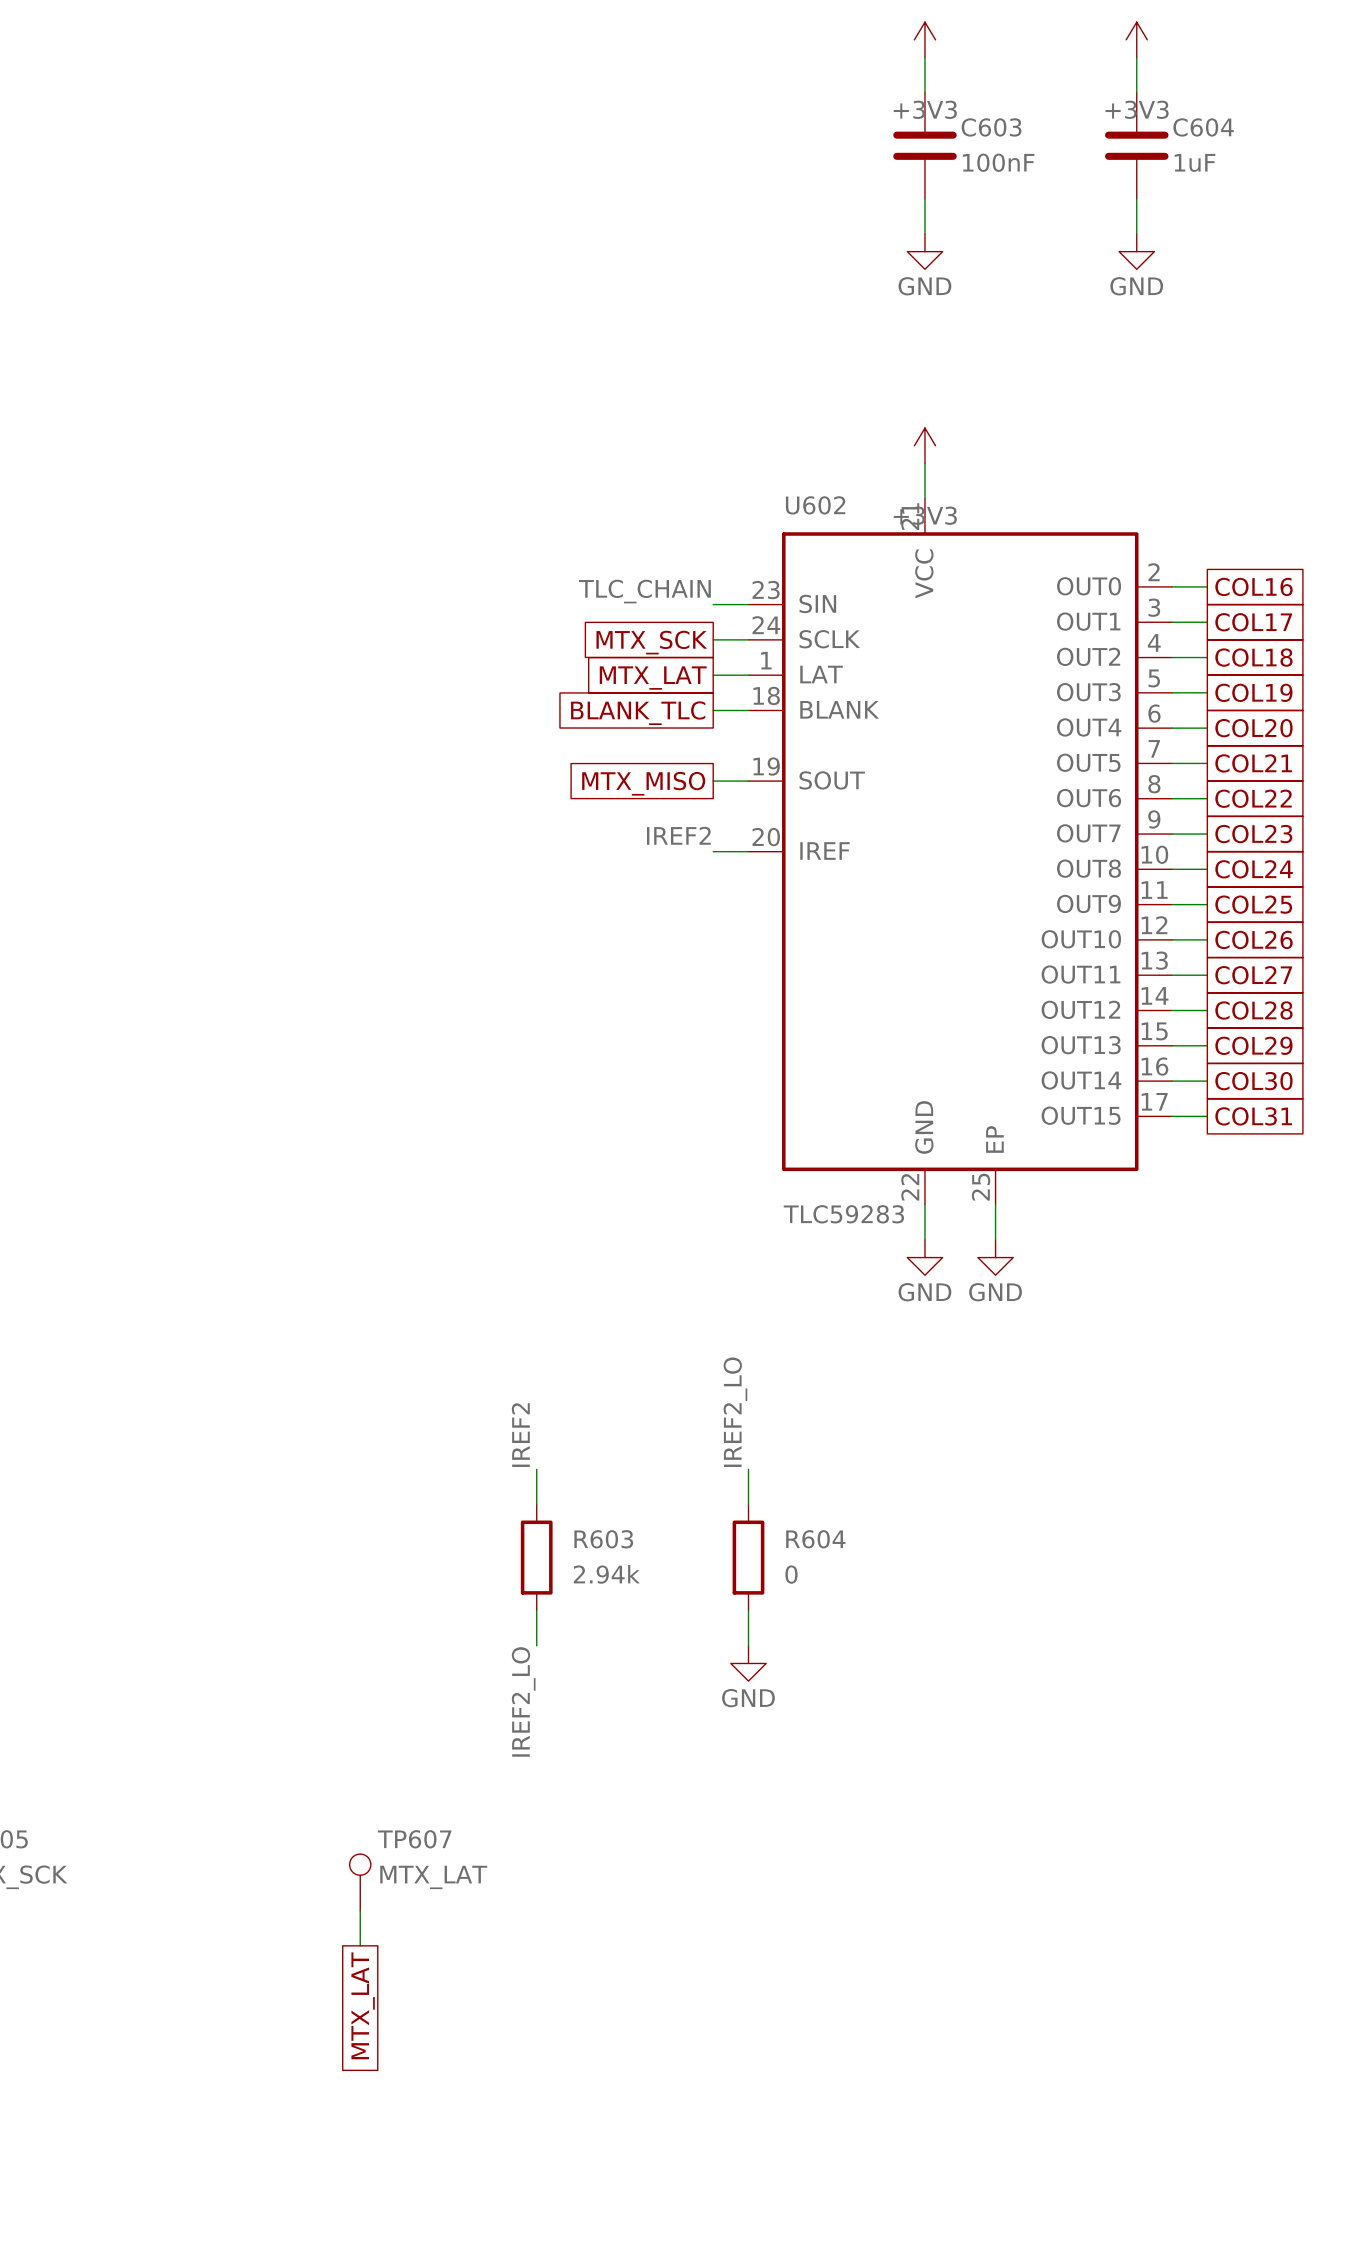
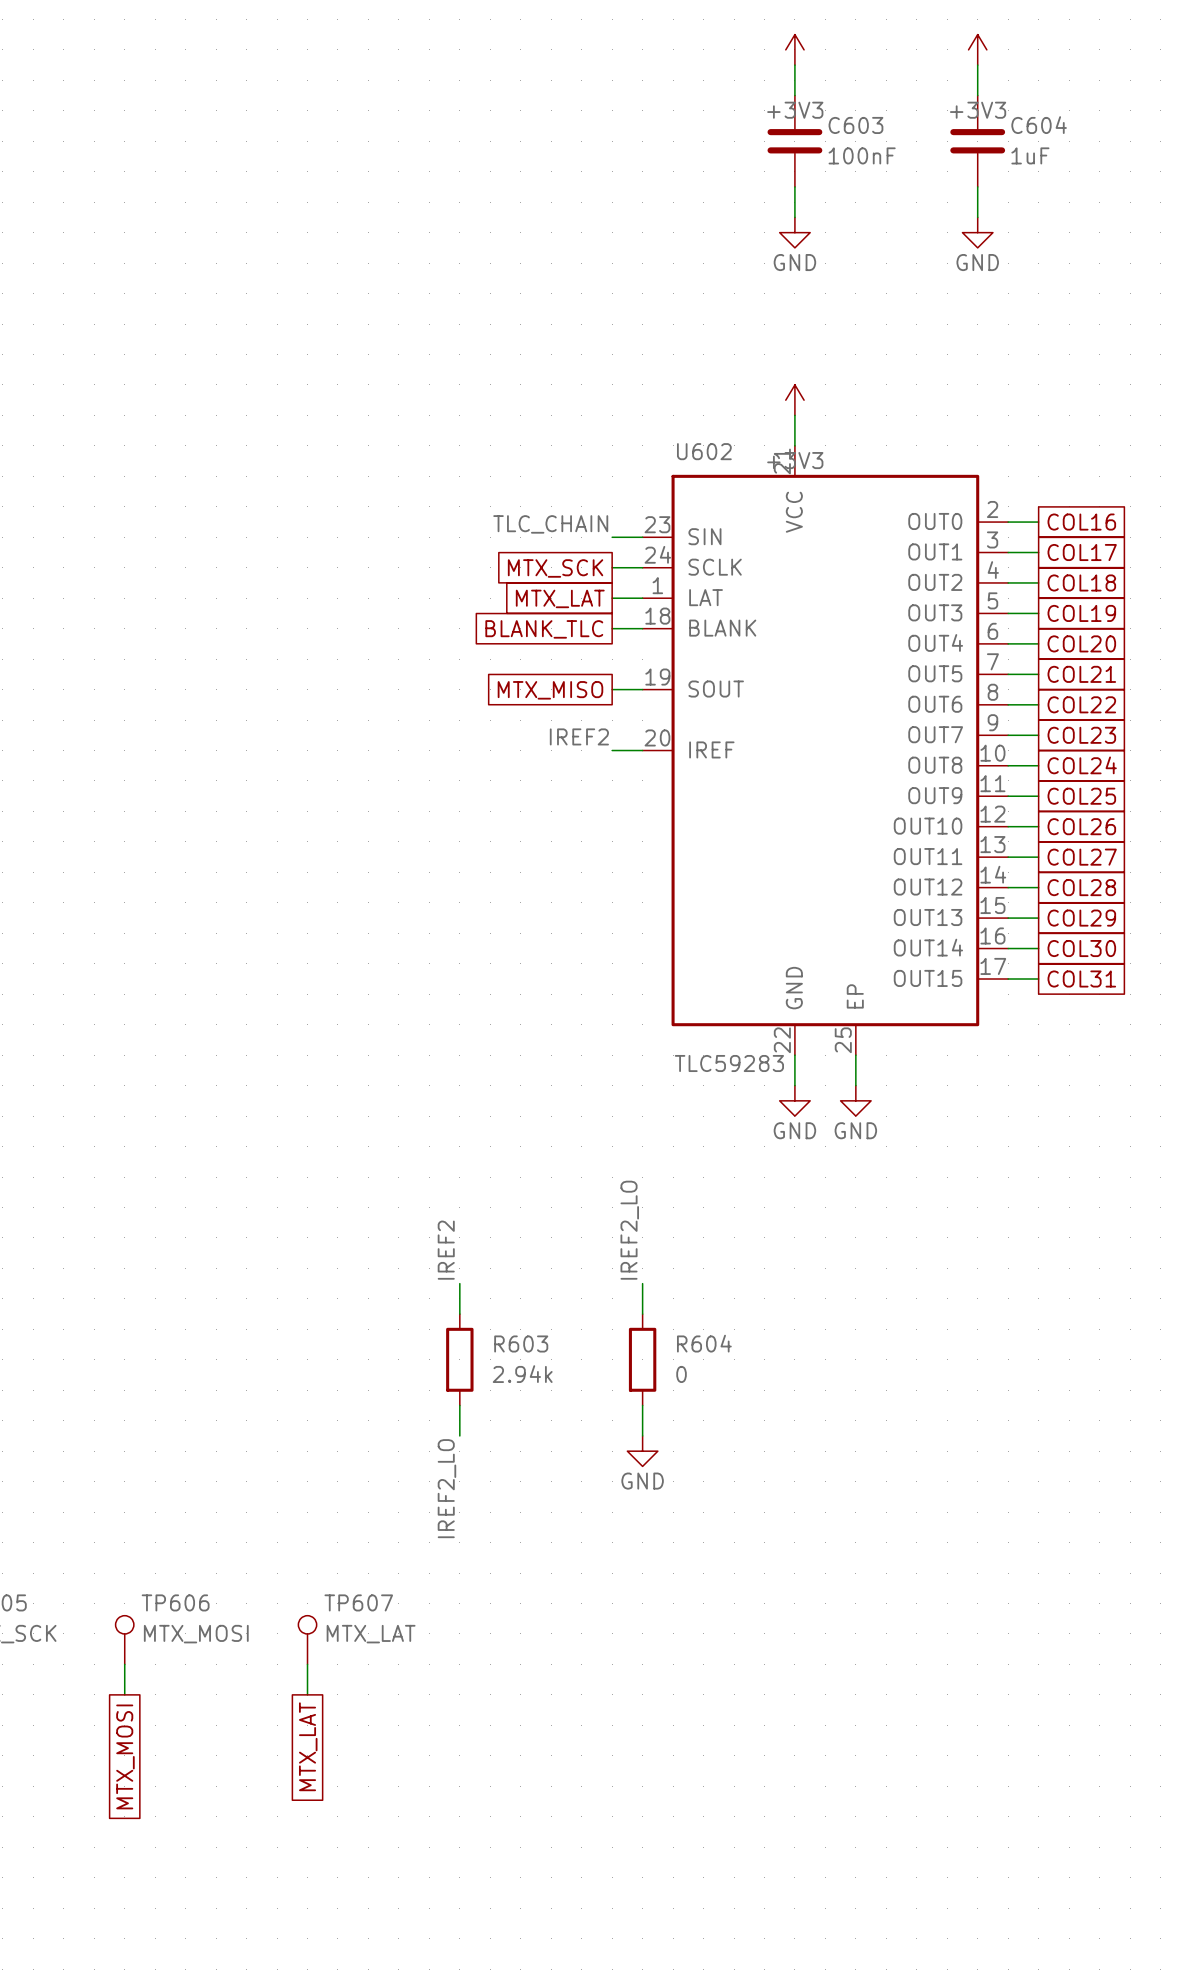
TP606: none -> MTX_MOSI (124, 1640)
wire: none -> (124, 1664) (124, 1694)
global label: none -> MTX_MOSI (125, 1756)

